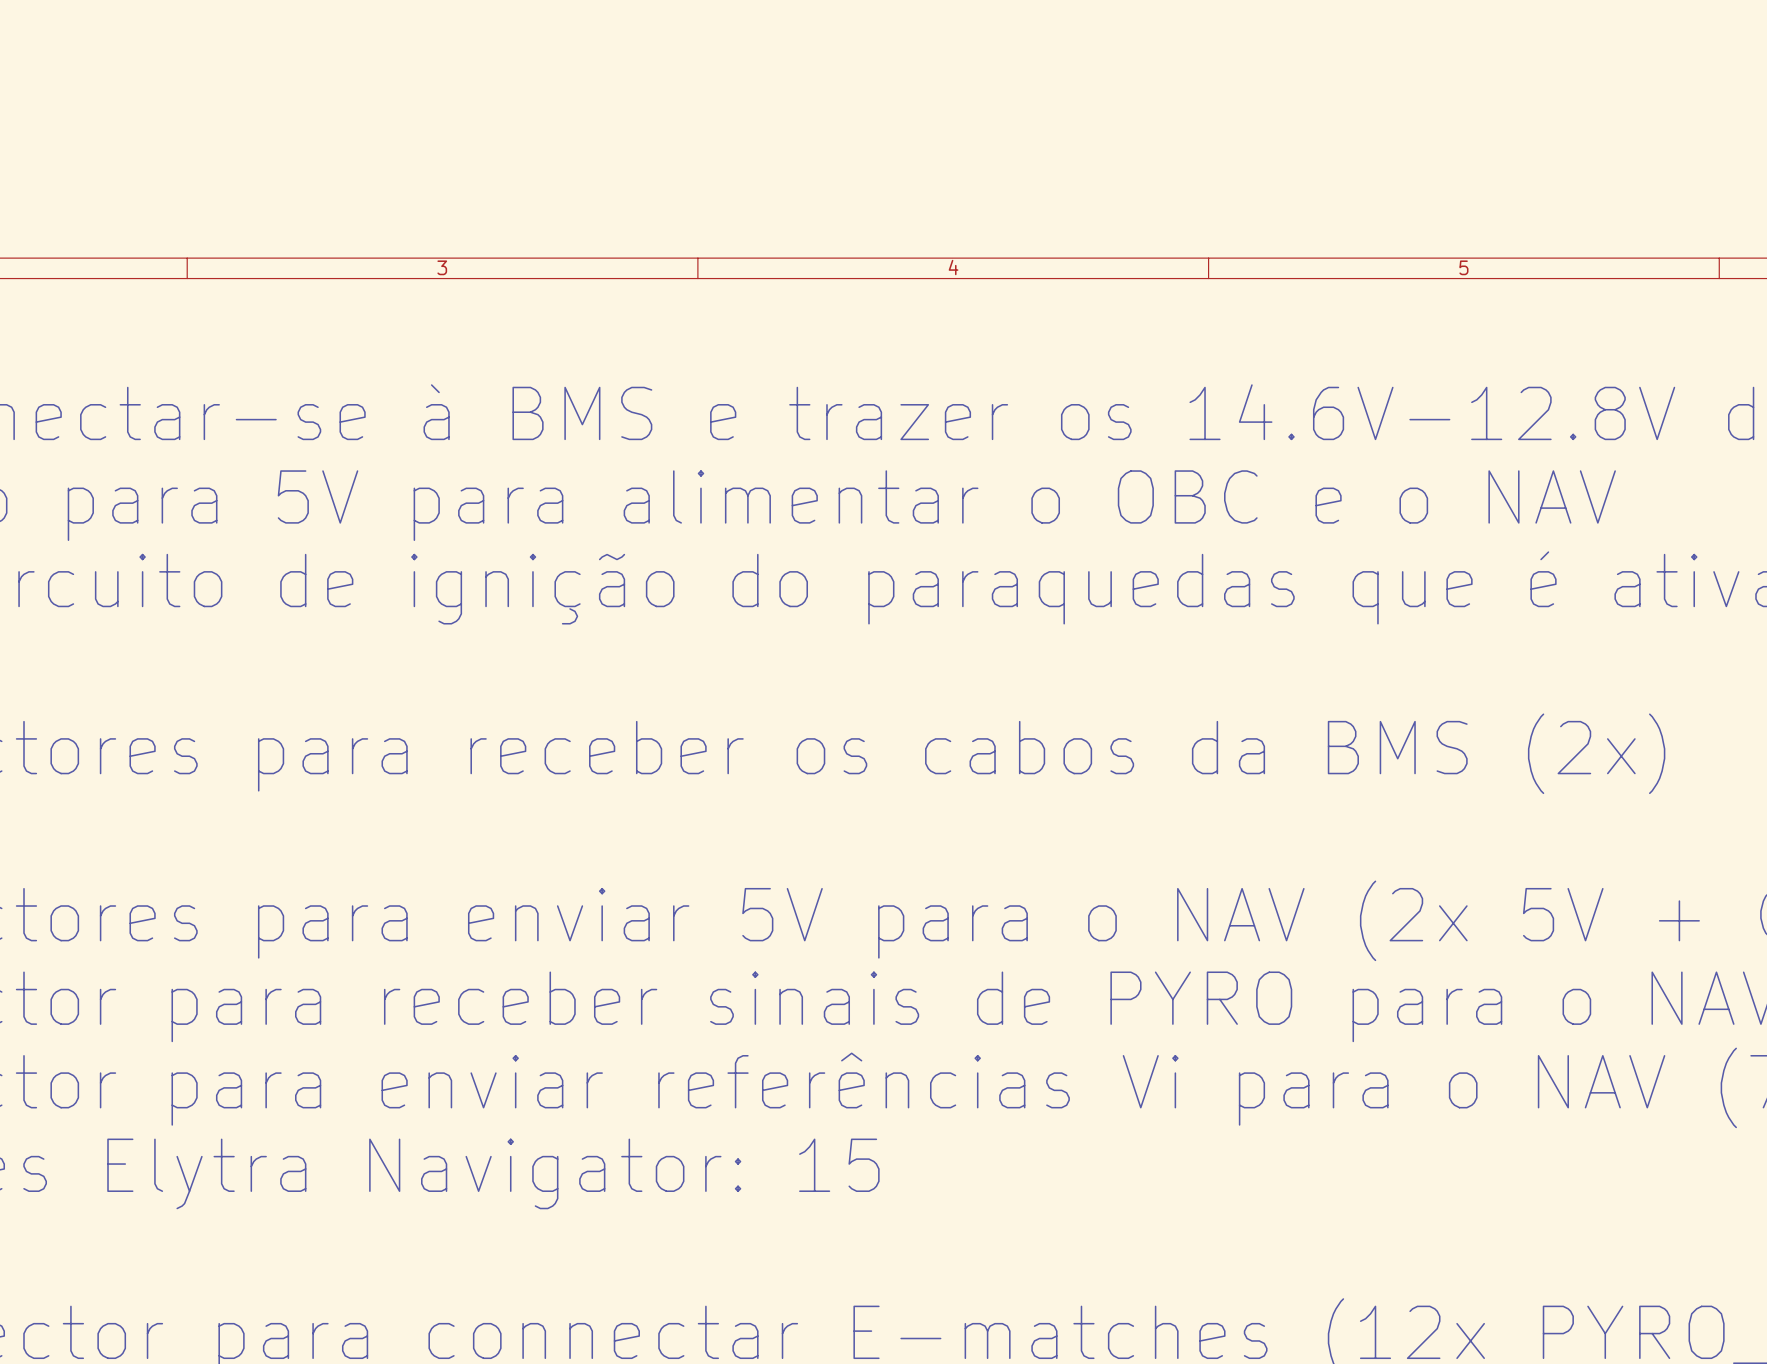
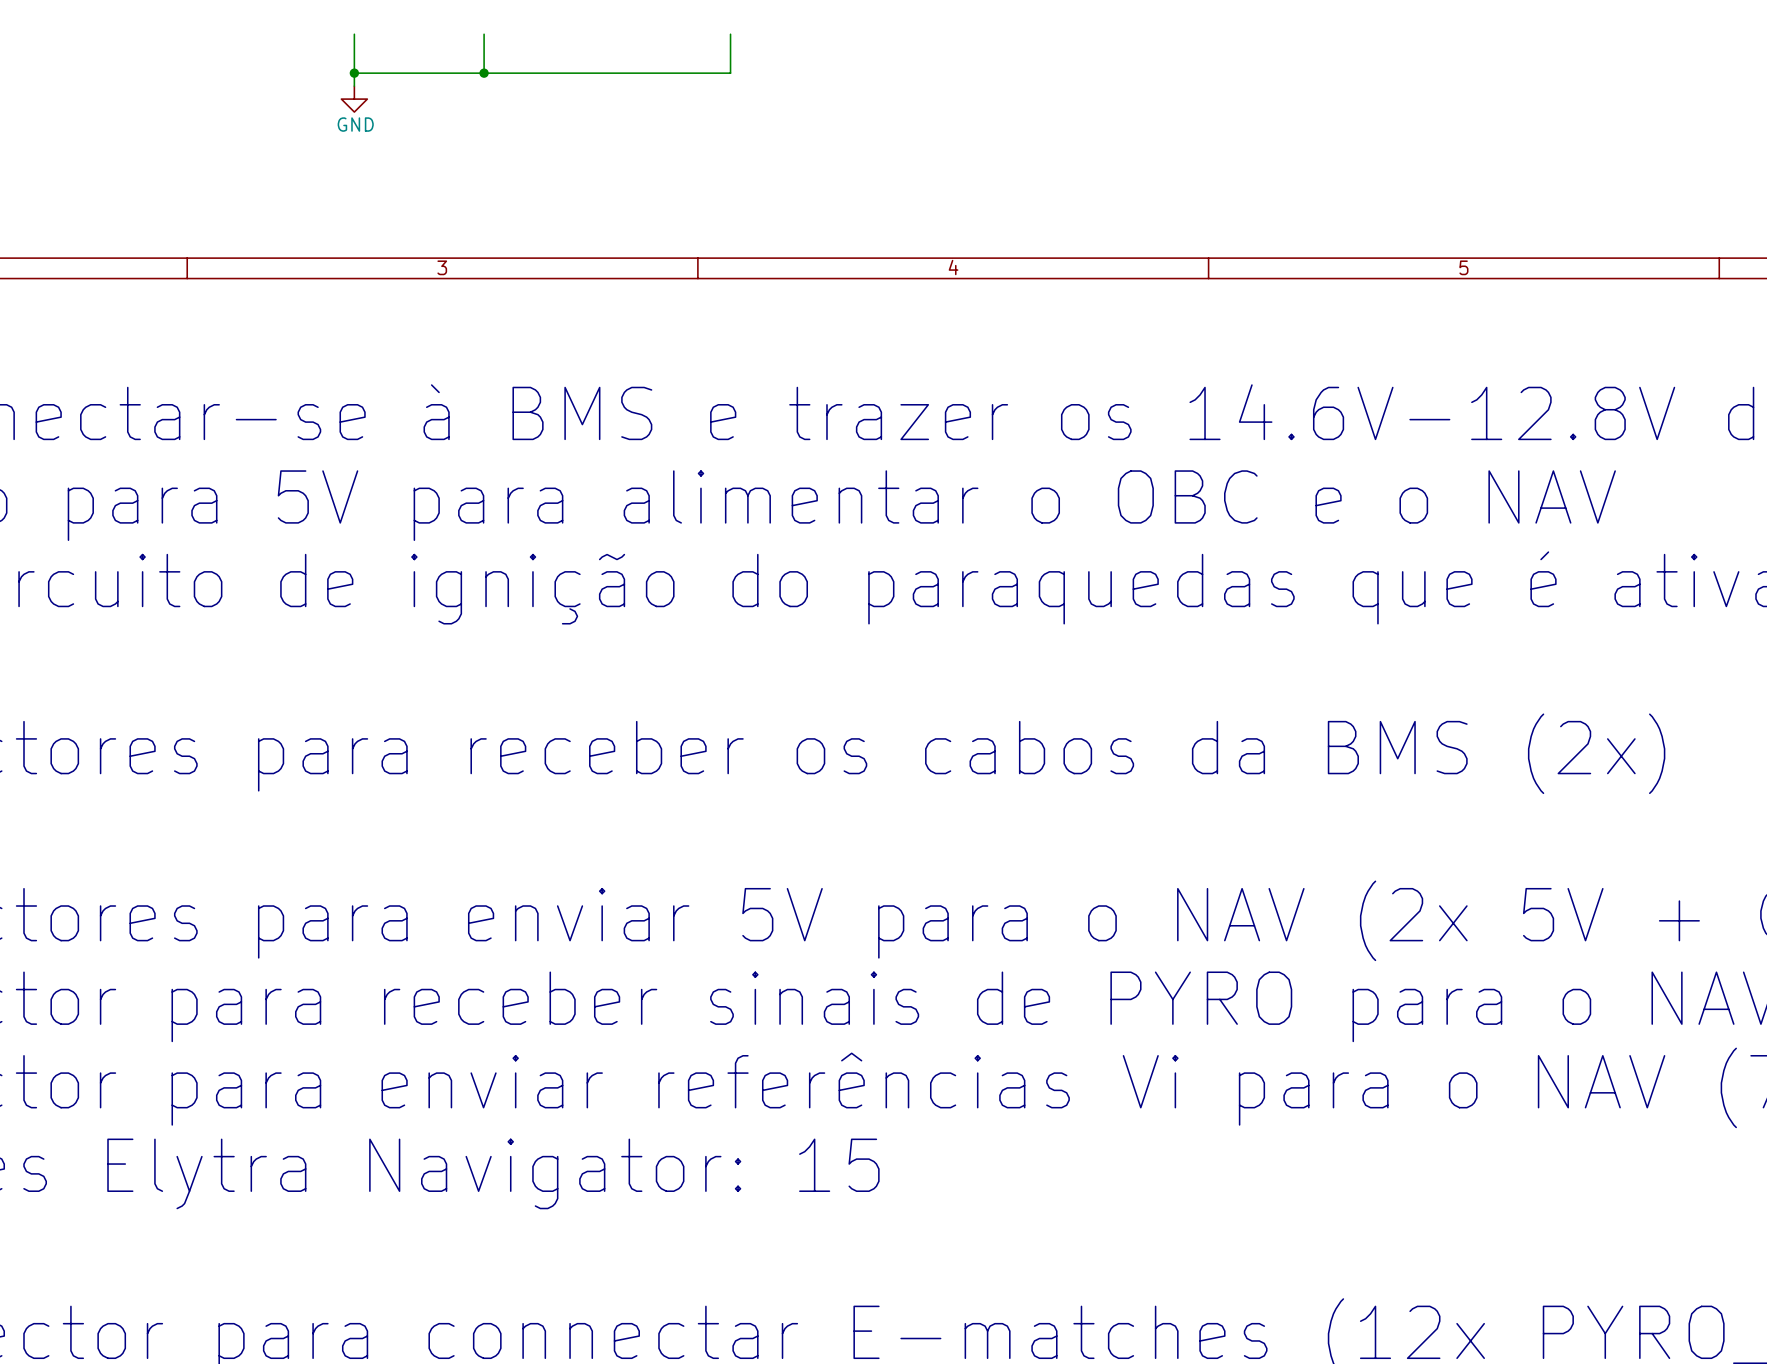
wire: none -> (354, 34) (354, 86)
wire: none -> (484, 34) (484, 73)
wire: none -> (730, 34) (730, 73) (354, 73)
junction: none -> (354, 73)
junction: none -> (484, 73)
power symbol: none -> GND (354, 99)

